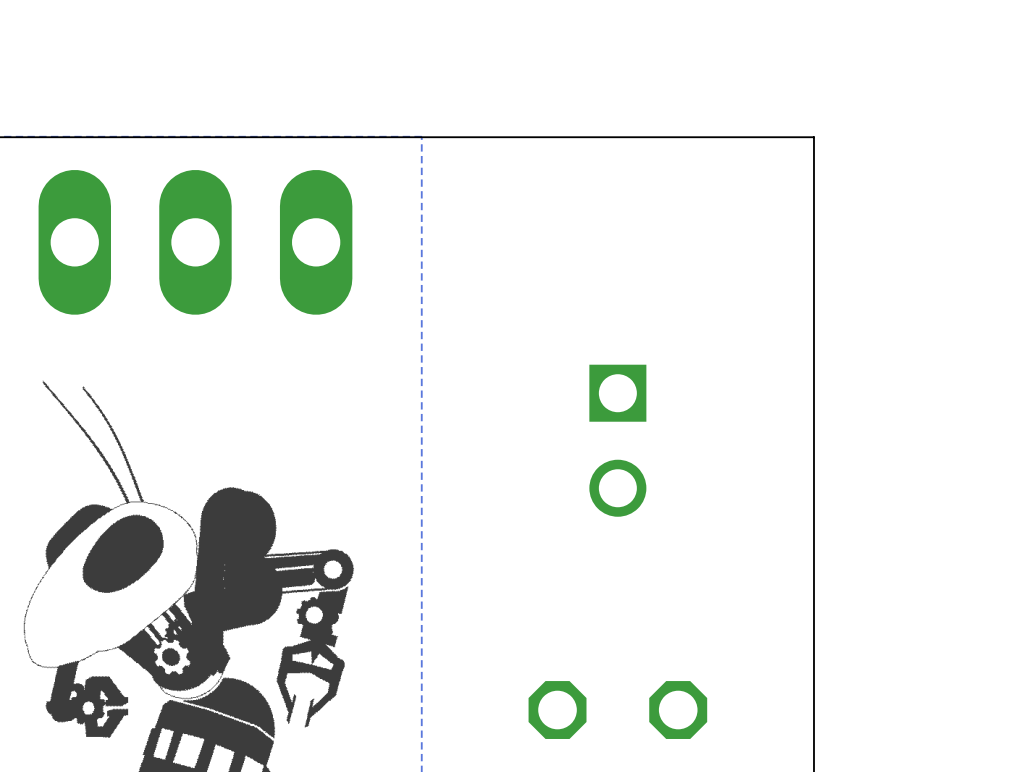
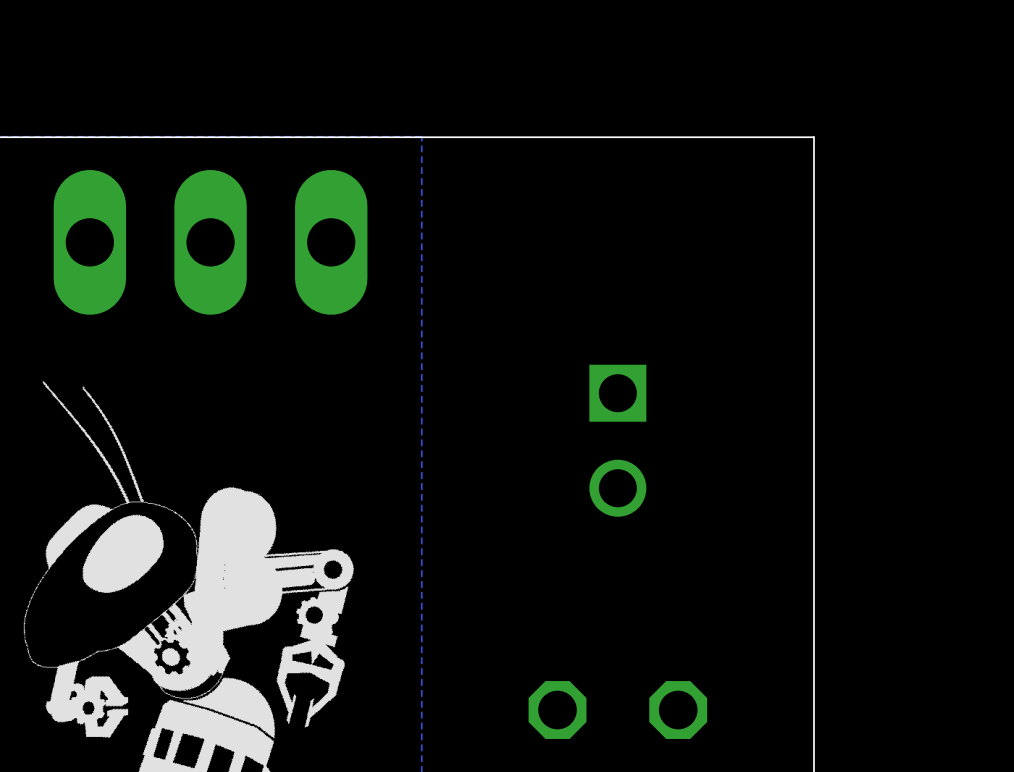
part position: (195, 242) -> (210, 242)

